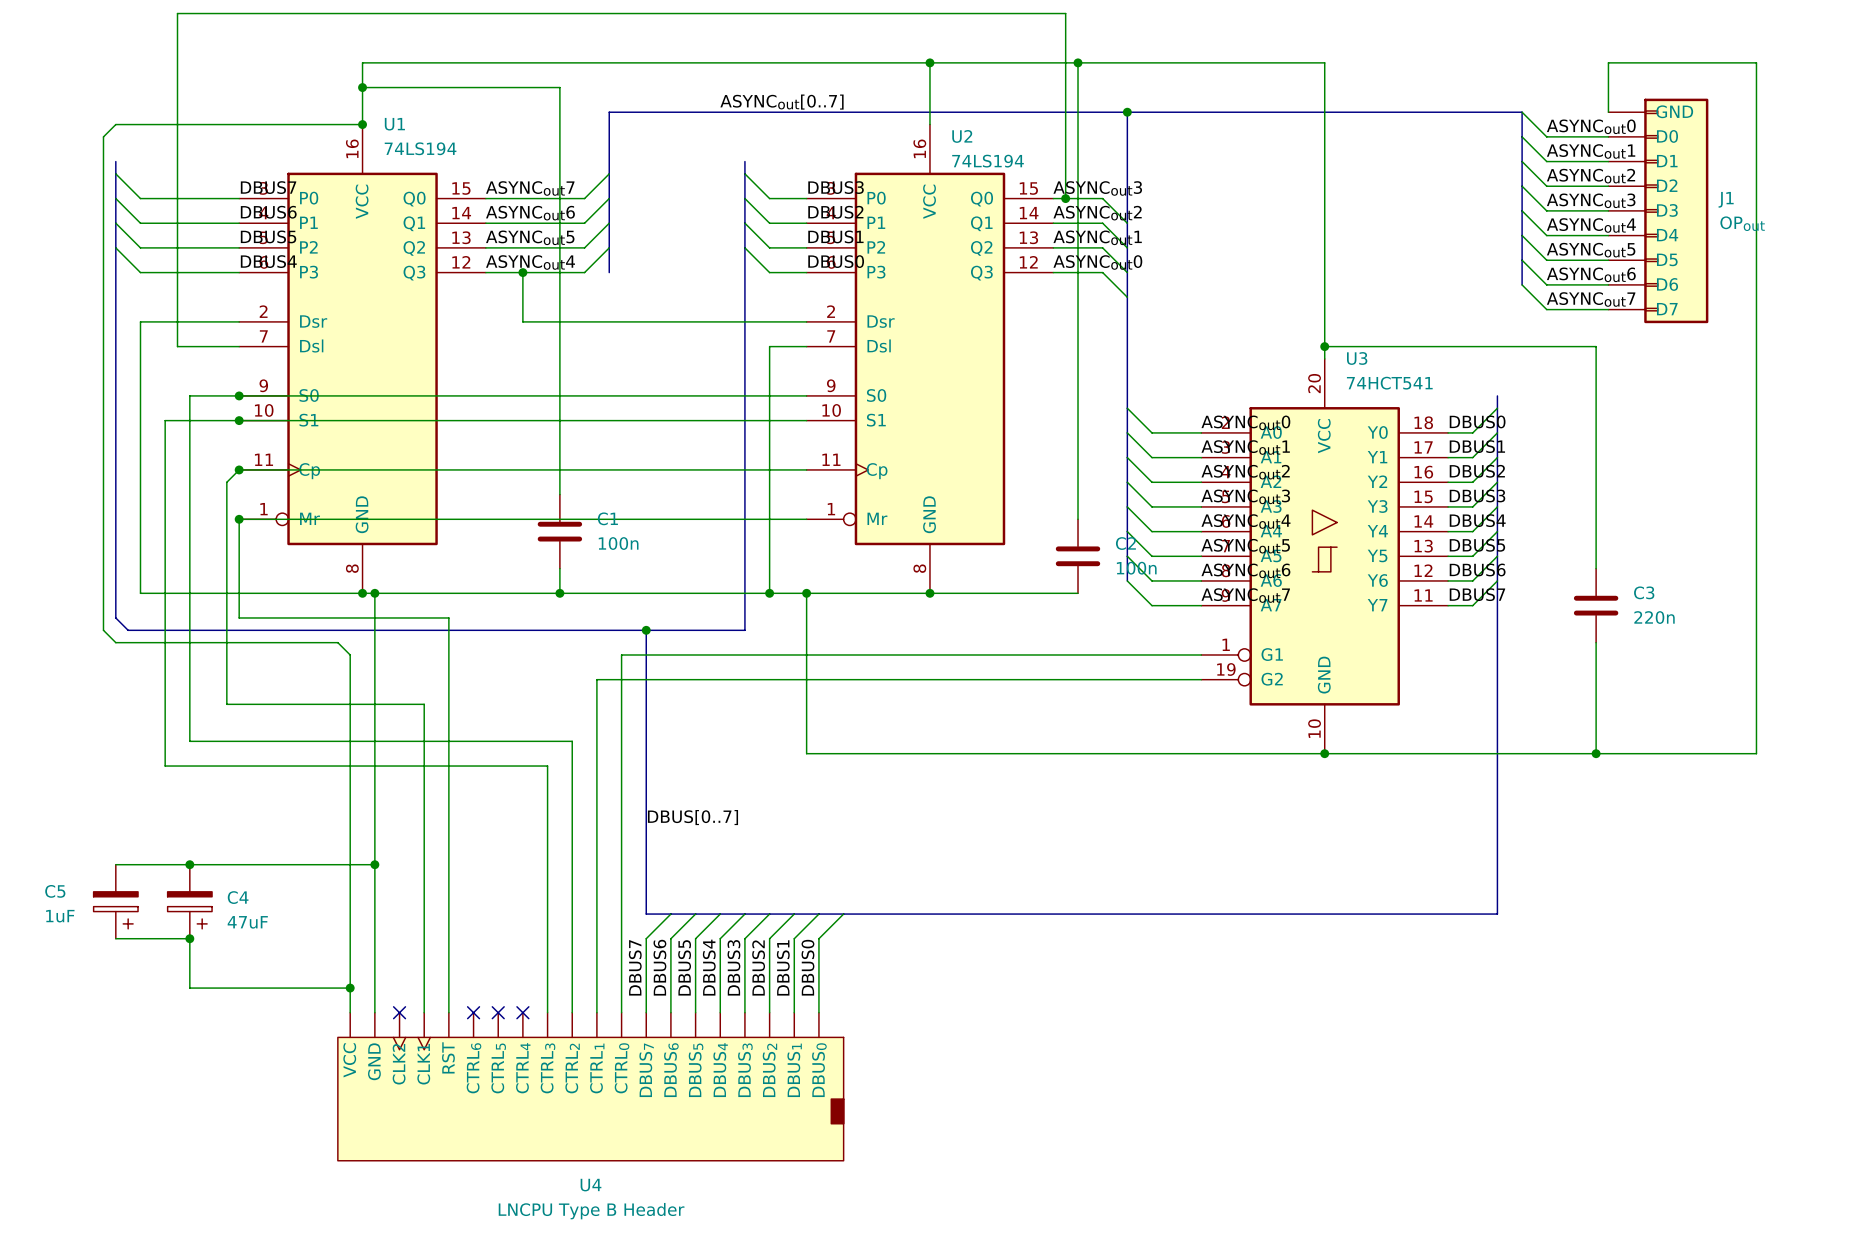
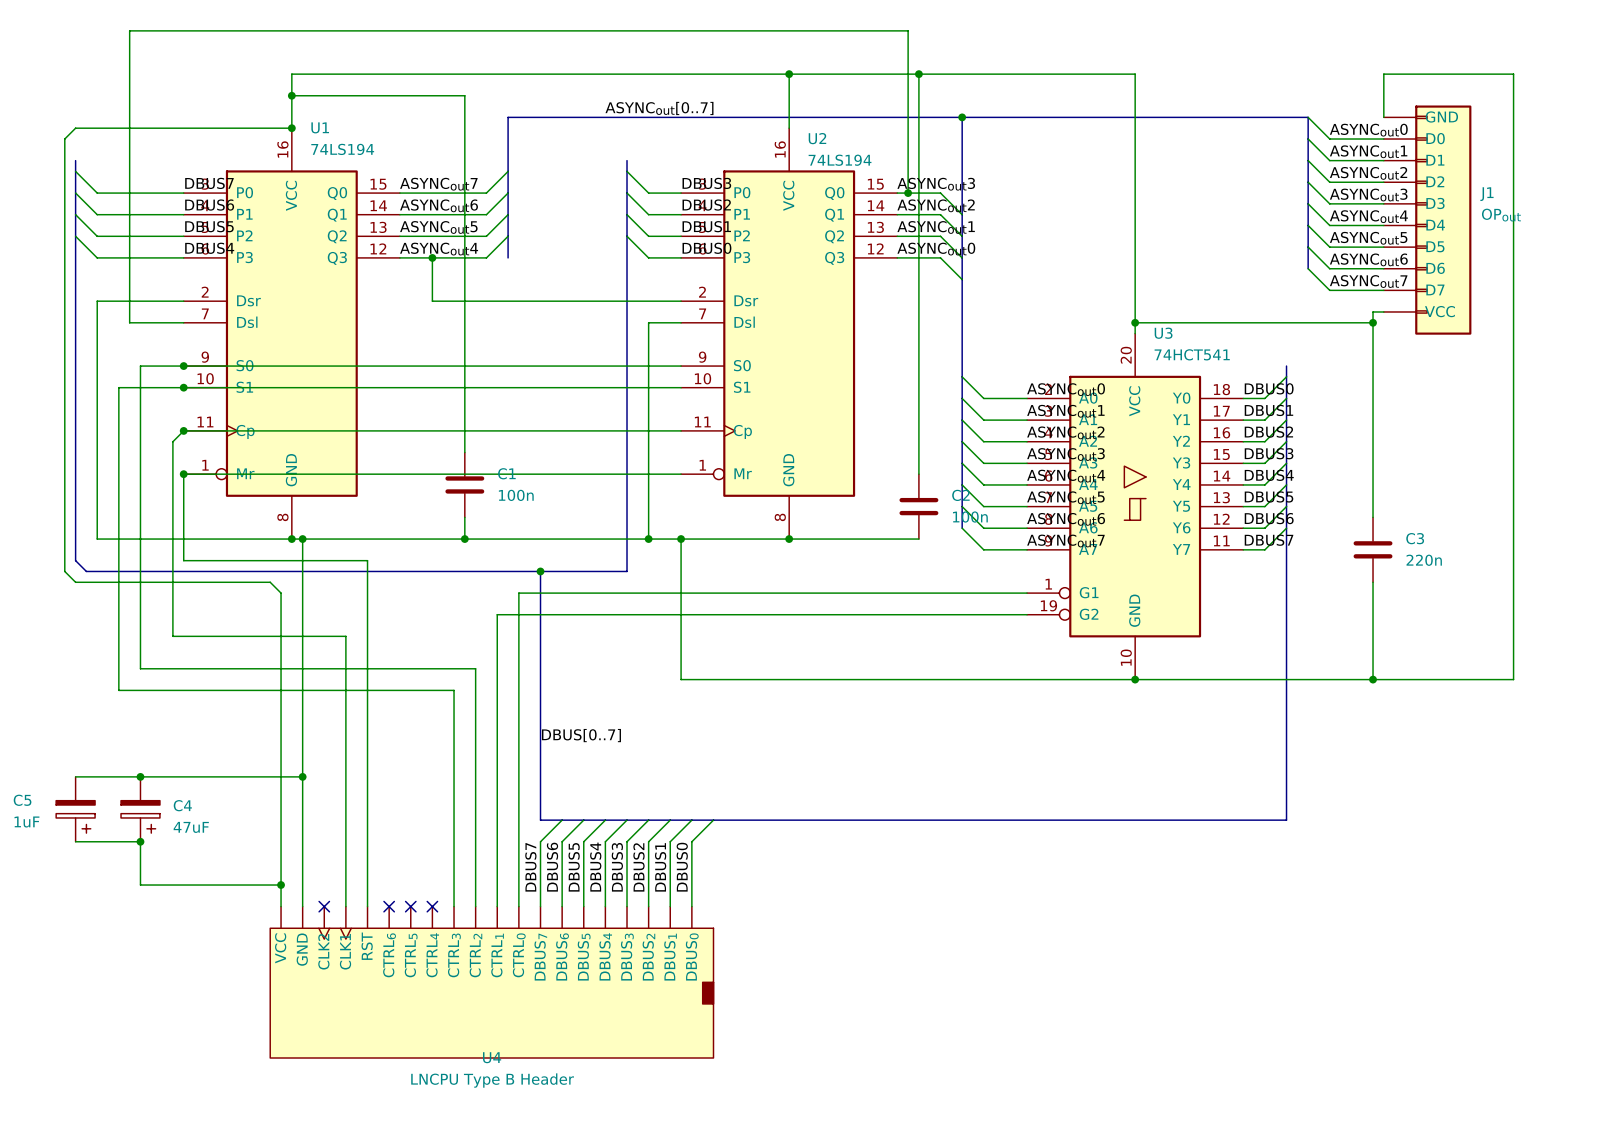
J1 symbol: [1608, 98, 1709, 324] -> [1383, 105, 1472, 335]
wire: none -> (1383, 311) (1373, 311) (1373, 322)
junction: none -> (1373, 322)
U4 symbol: [337, 1012, 844, 1161] -> [270, 906, 714, 1059]

